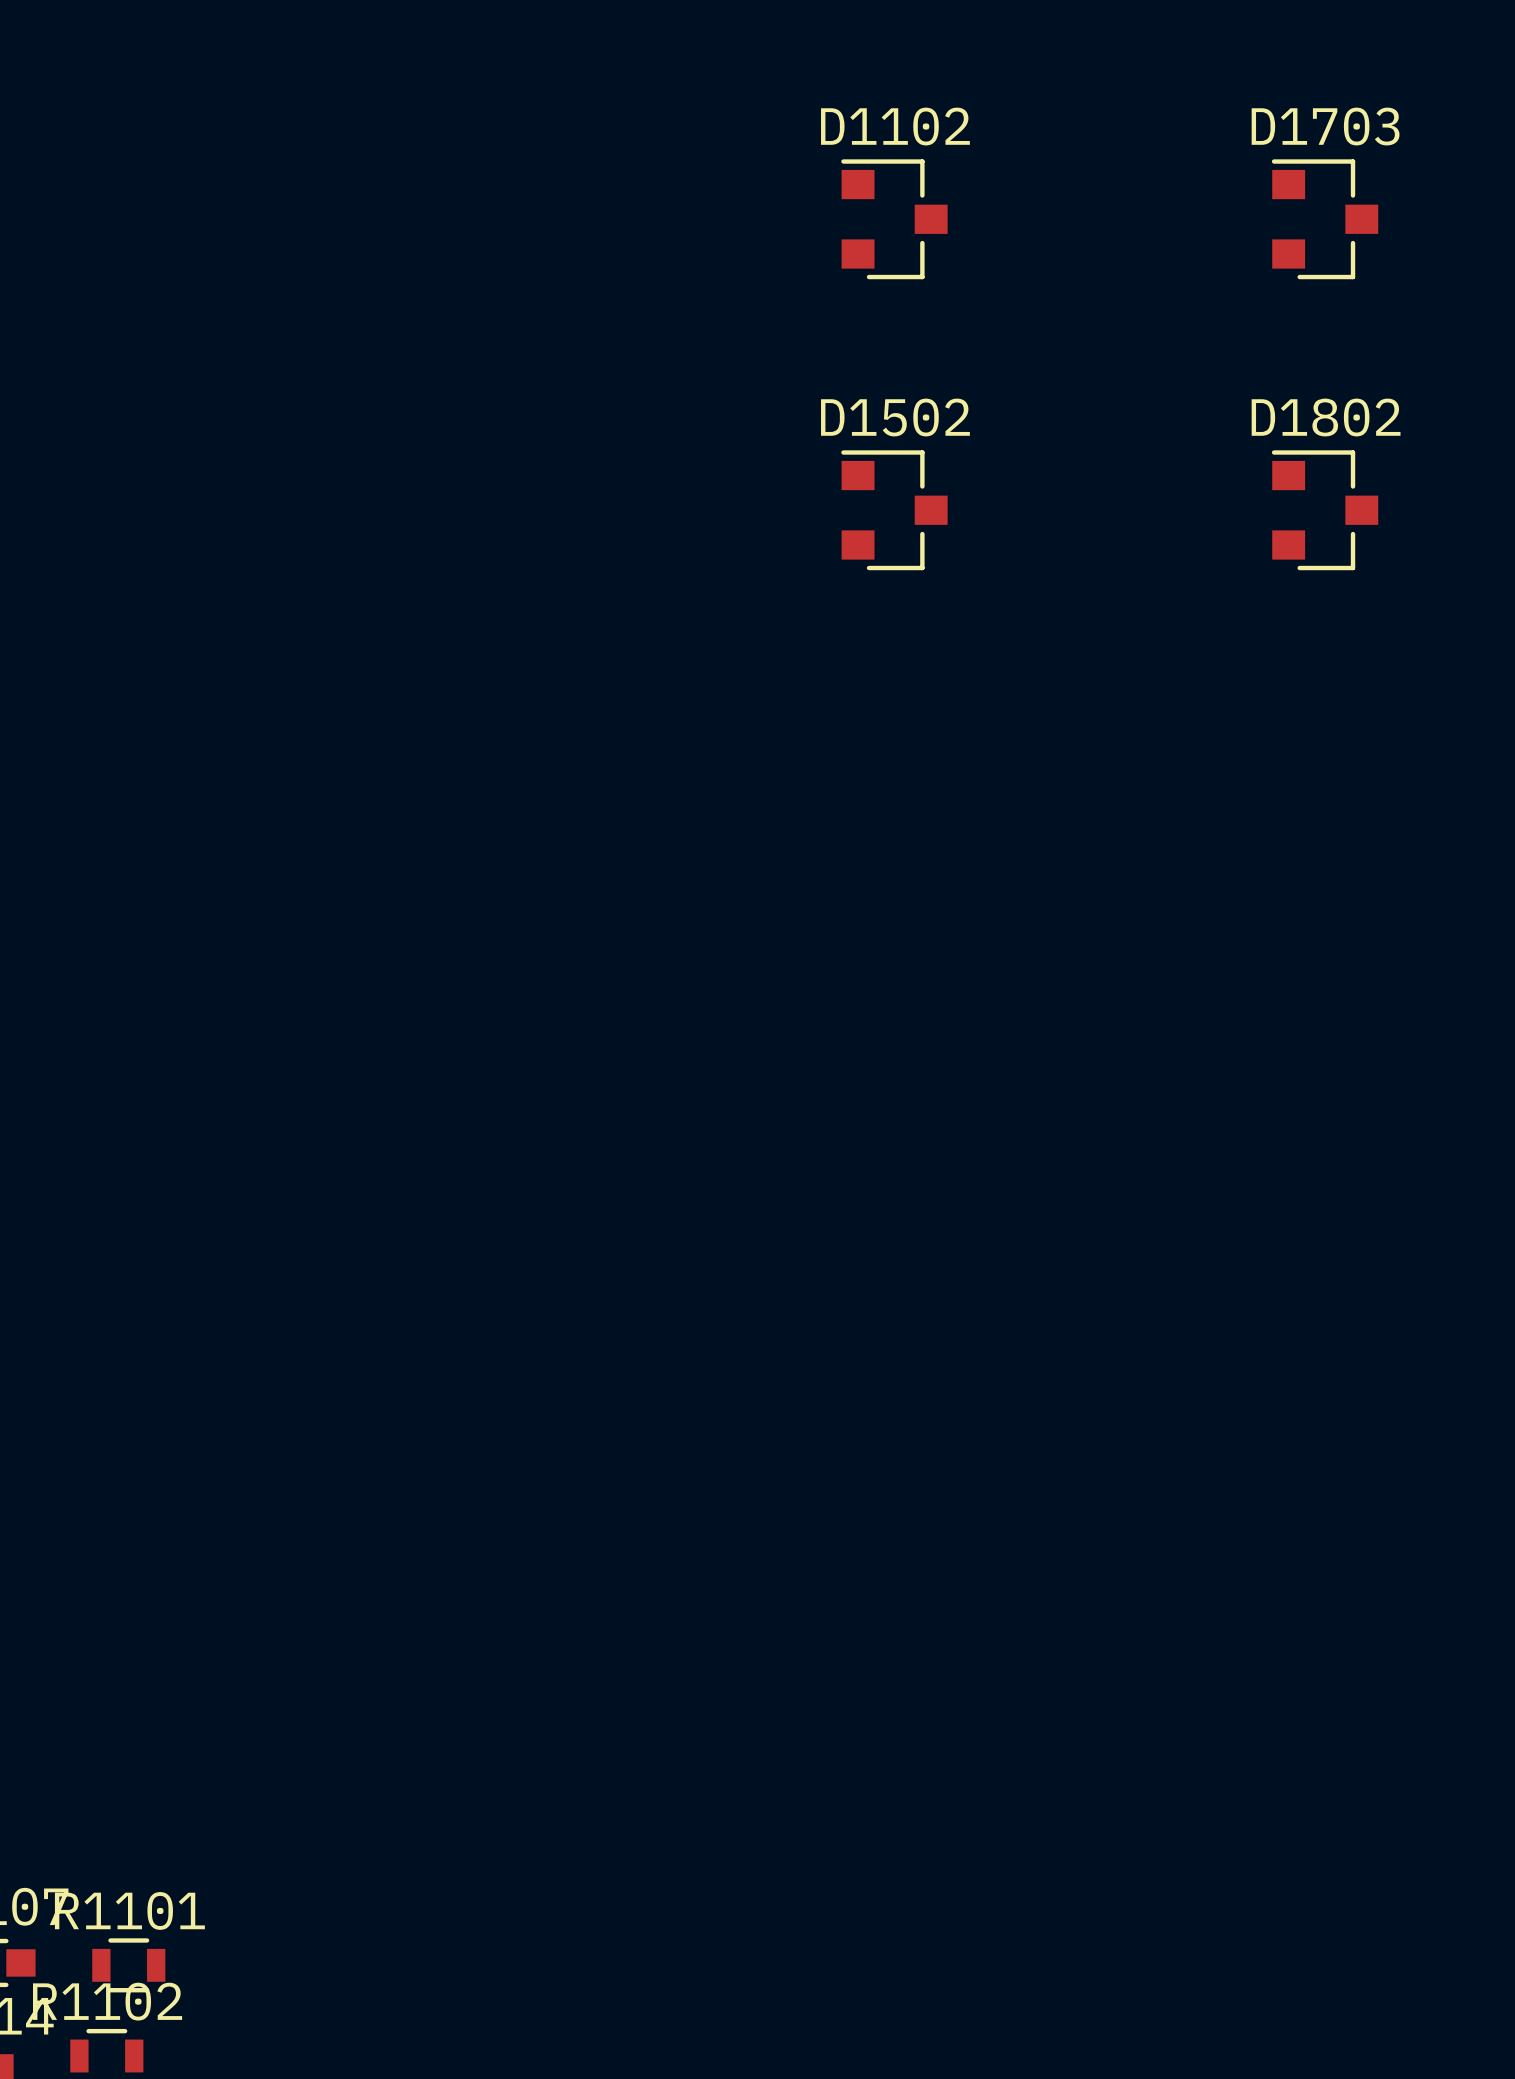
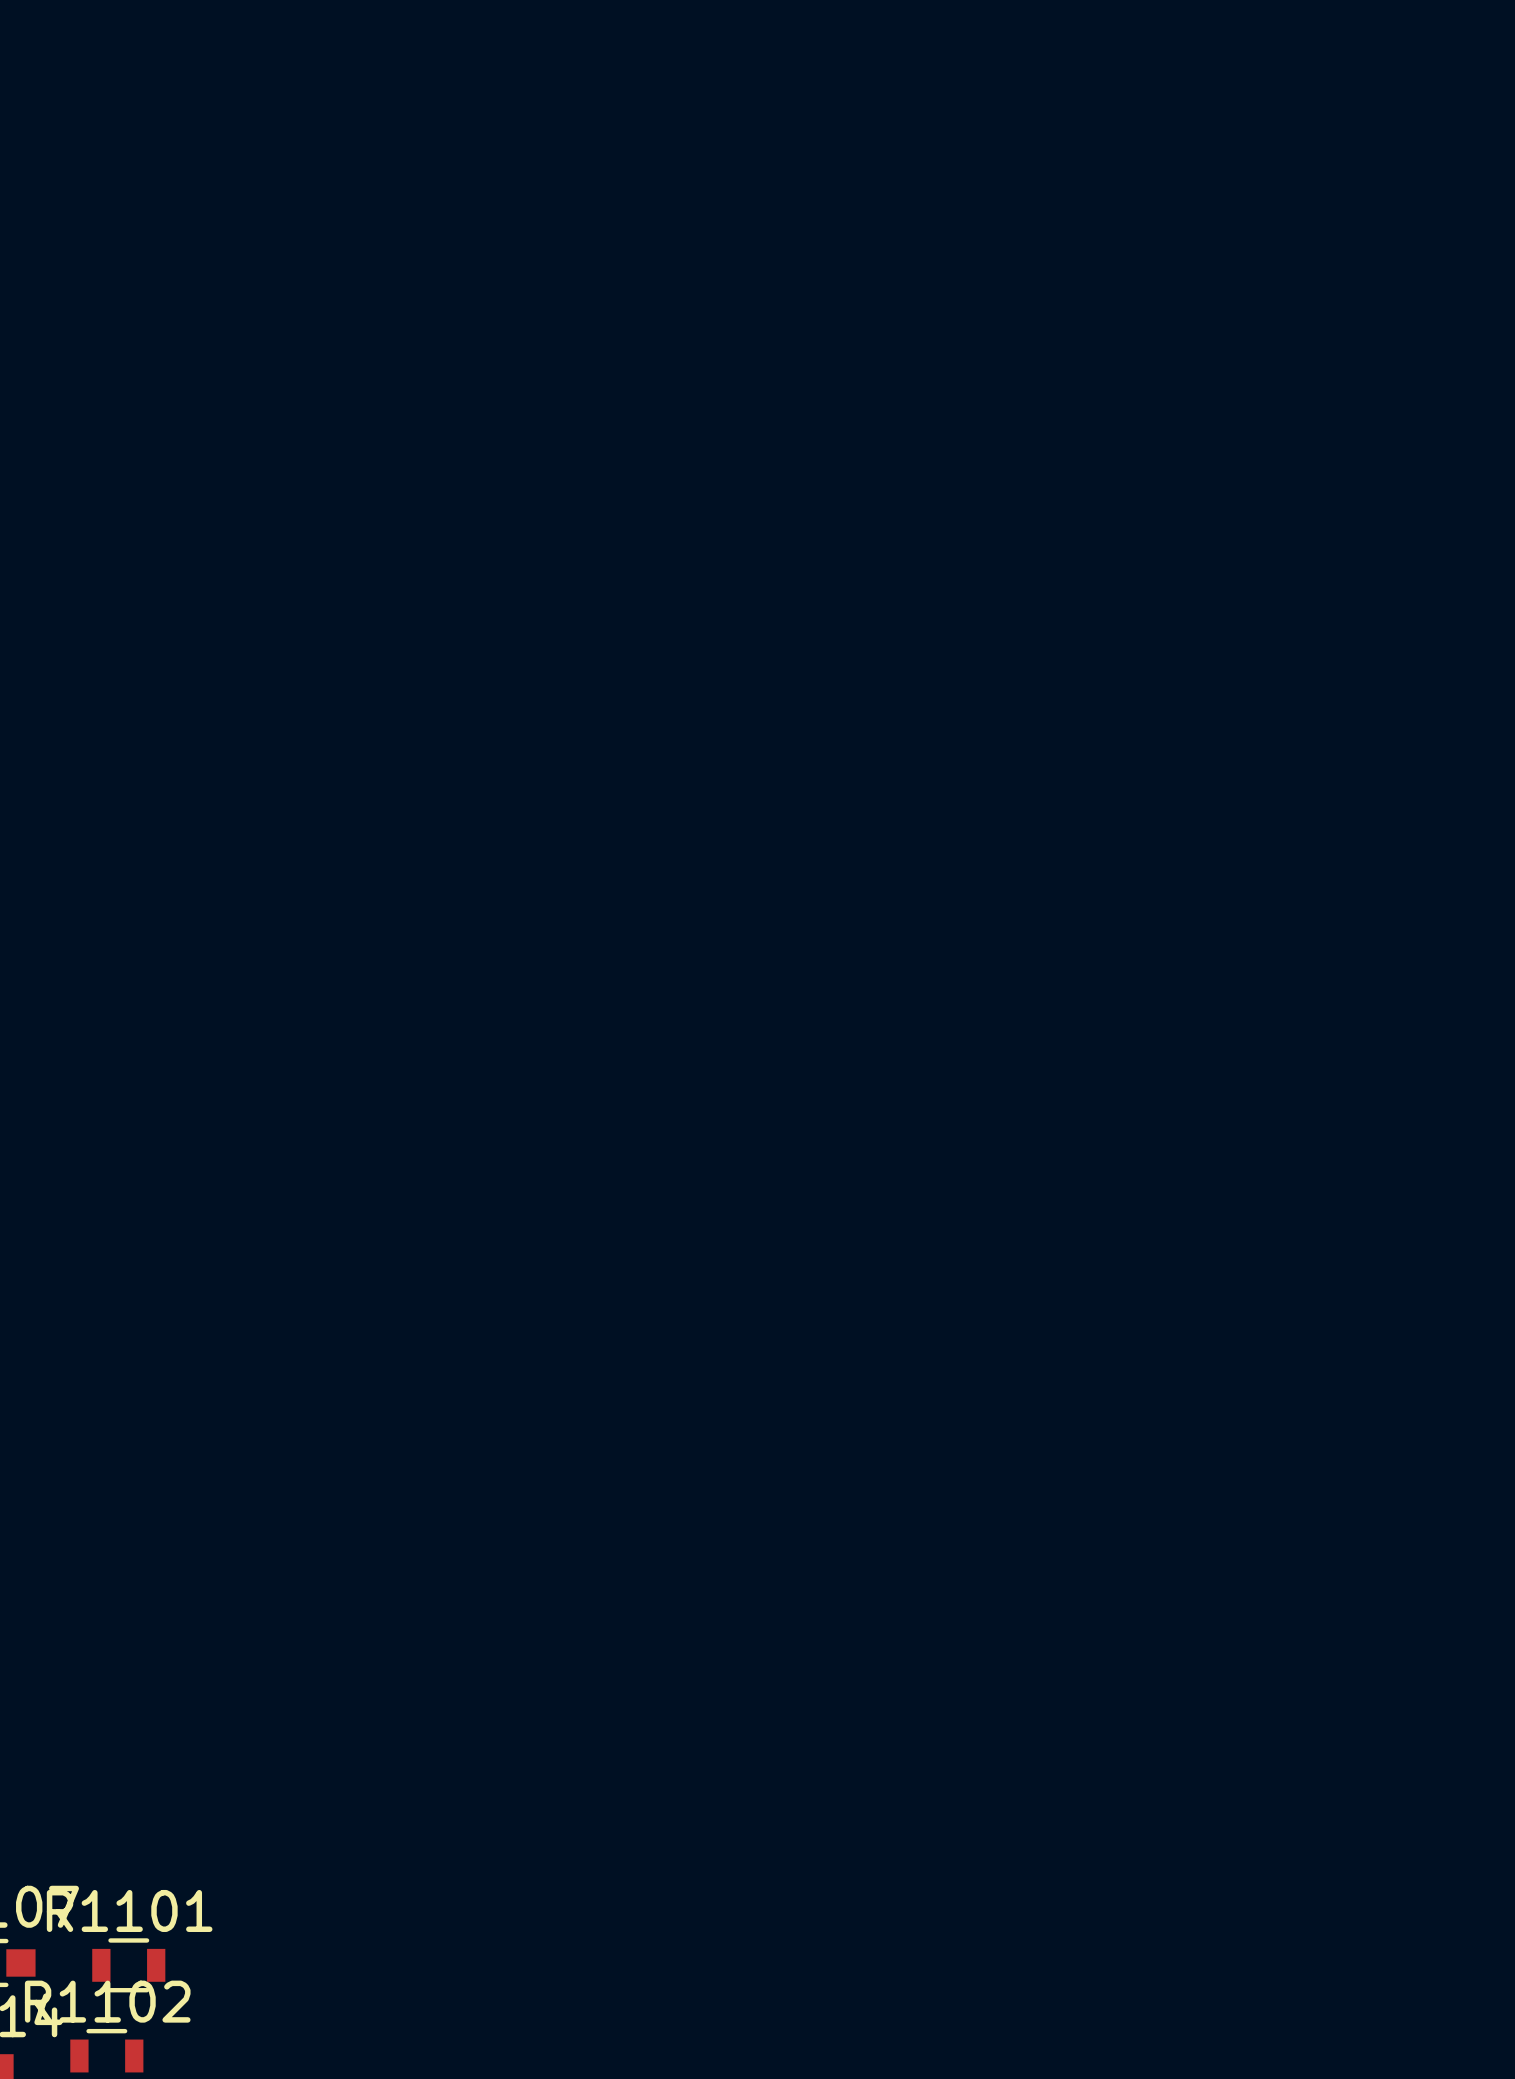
D1102: (894, 219) -> none
D1703: (1325, 219) -> none
D1502: (894, 510) -> none
D1802: (1325, 510) -> none

